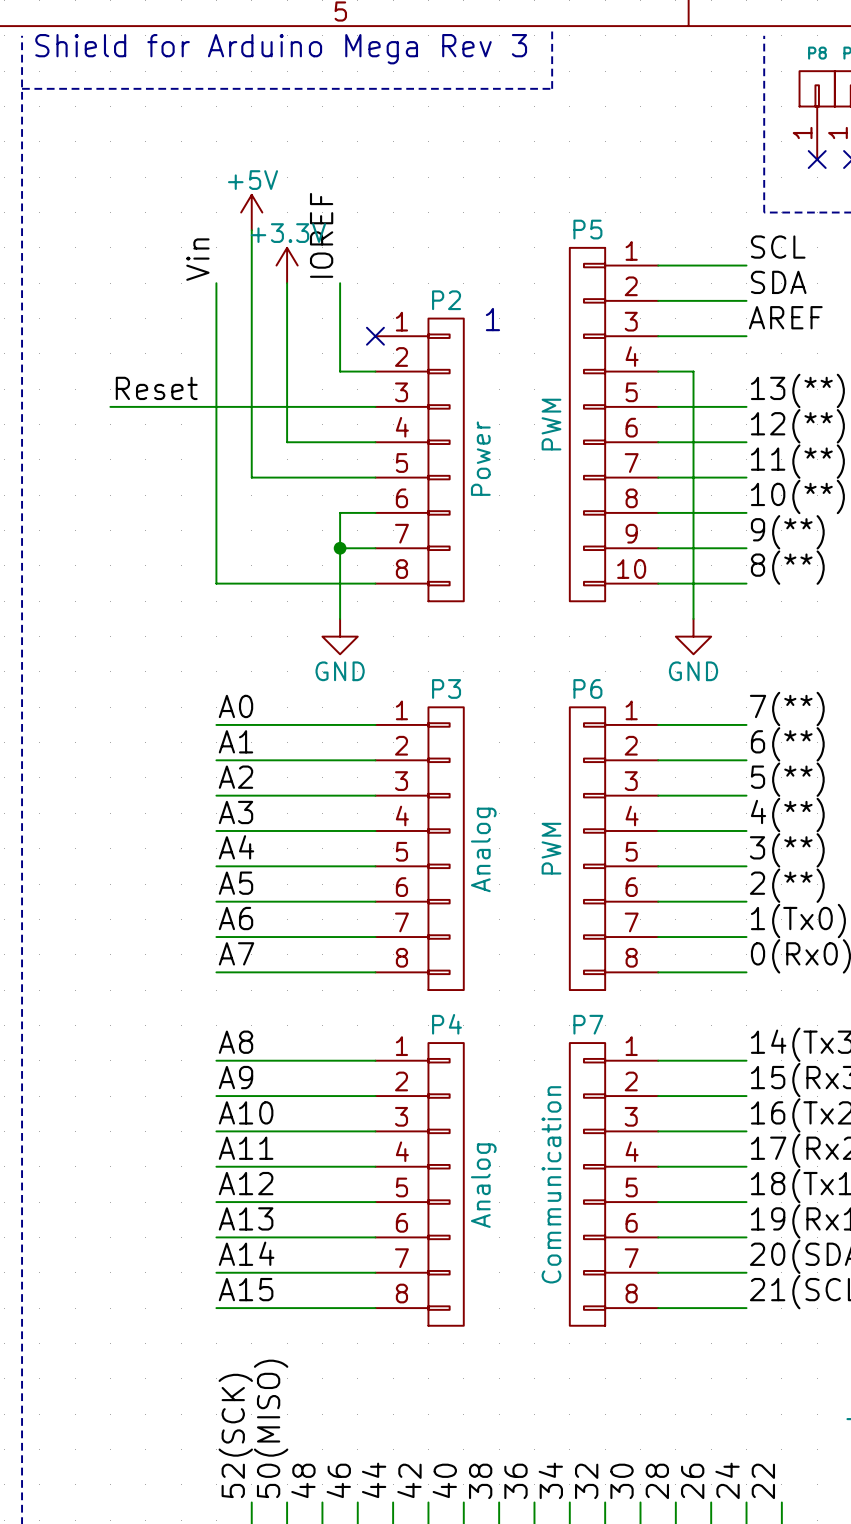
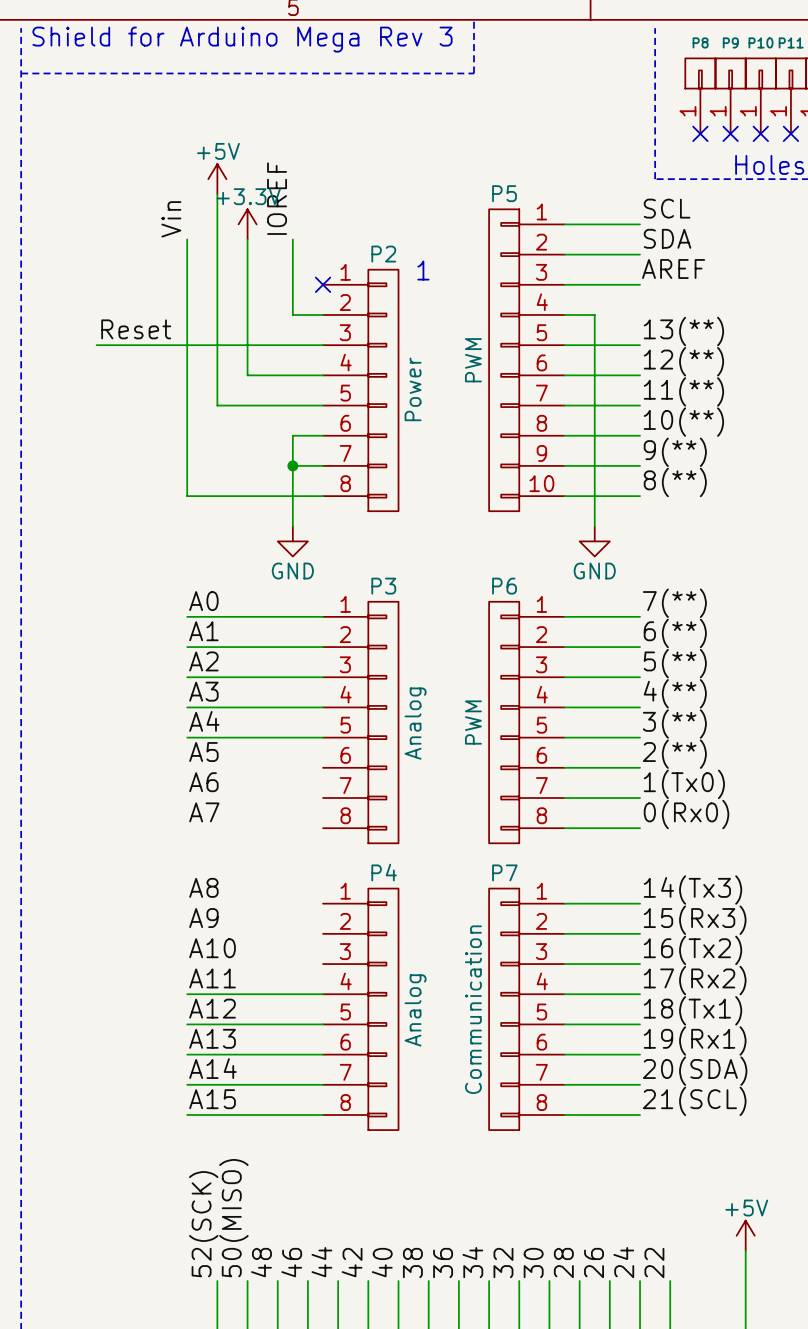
wire: (216, 901) (375, 901) -> none
wire: (216, 937) (375, 937) -> none
wire: (216, 972) (375, 972) -> none
wire: (216, 1060) (375, 1060) -> none
wire: (216, 1096) (375, 1096) -> none
wire: (216, 1131) (375, 1131) -> none

